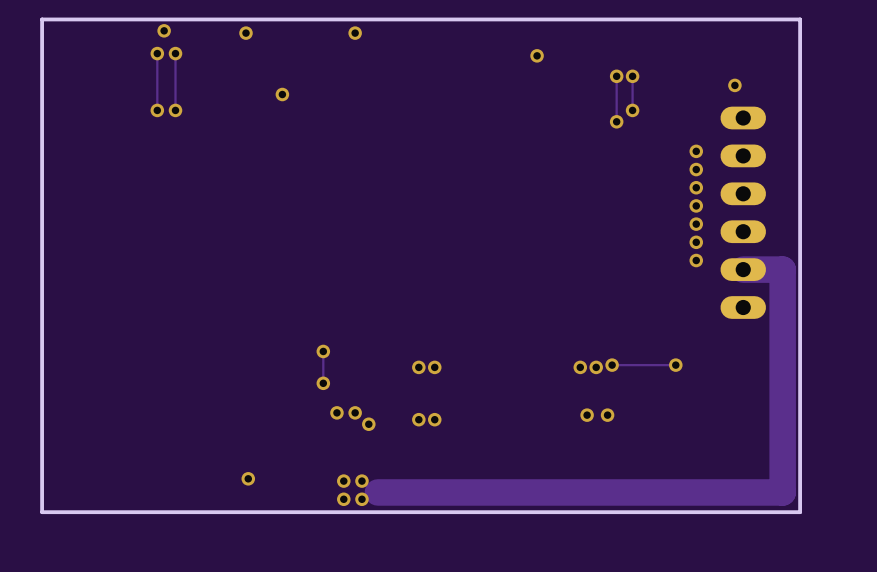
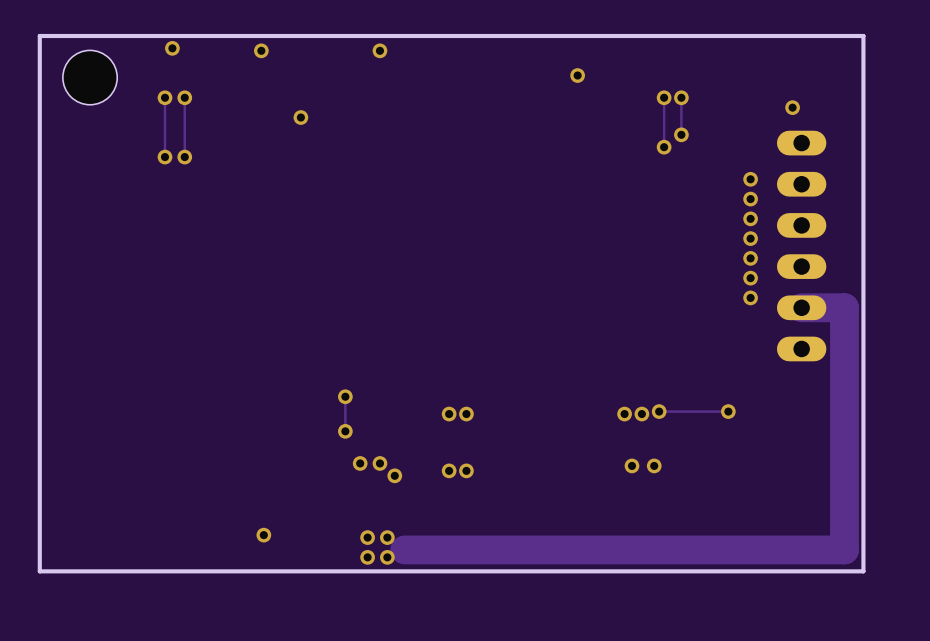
track: (157, 53) (157, 76) -> none
via: (157, 53) -> none
track: (175, 53) (175, 76) -> none
via: (175, 53) -> none
hole: none -> (90, 77)
via: none -> (164, 97)
via: none -> (184, 97)
track: none -> (164, 134) (164, 157)
via: (157, 110) -> none
track: none -> (184, 134) (184, 157)
via: (175, 110) -> none
via: none -> (164, 157)
via: none -> (184, 157)

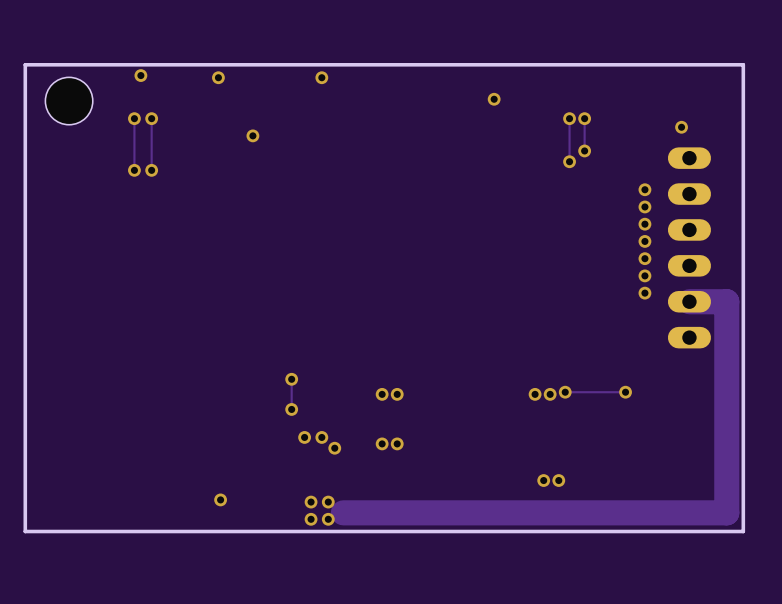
via: (631, 465) -> none
via: (654, 465) -> none
via: none -> (543, 480)
via: none -> (558, 480)

